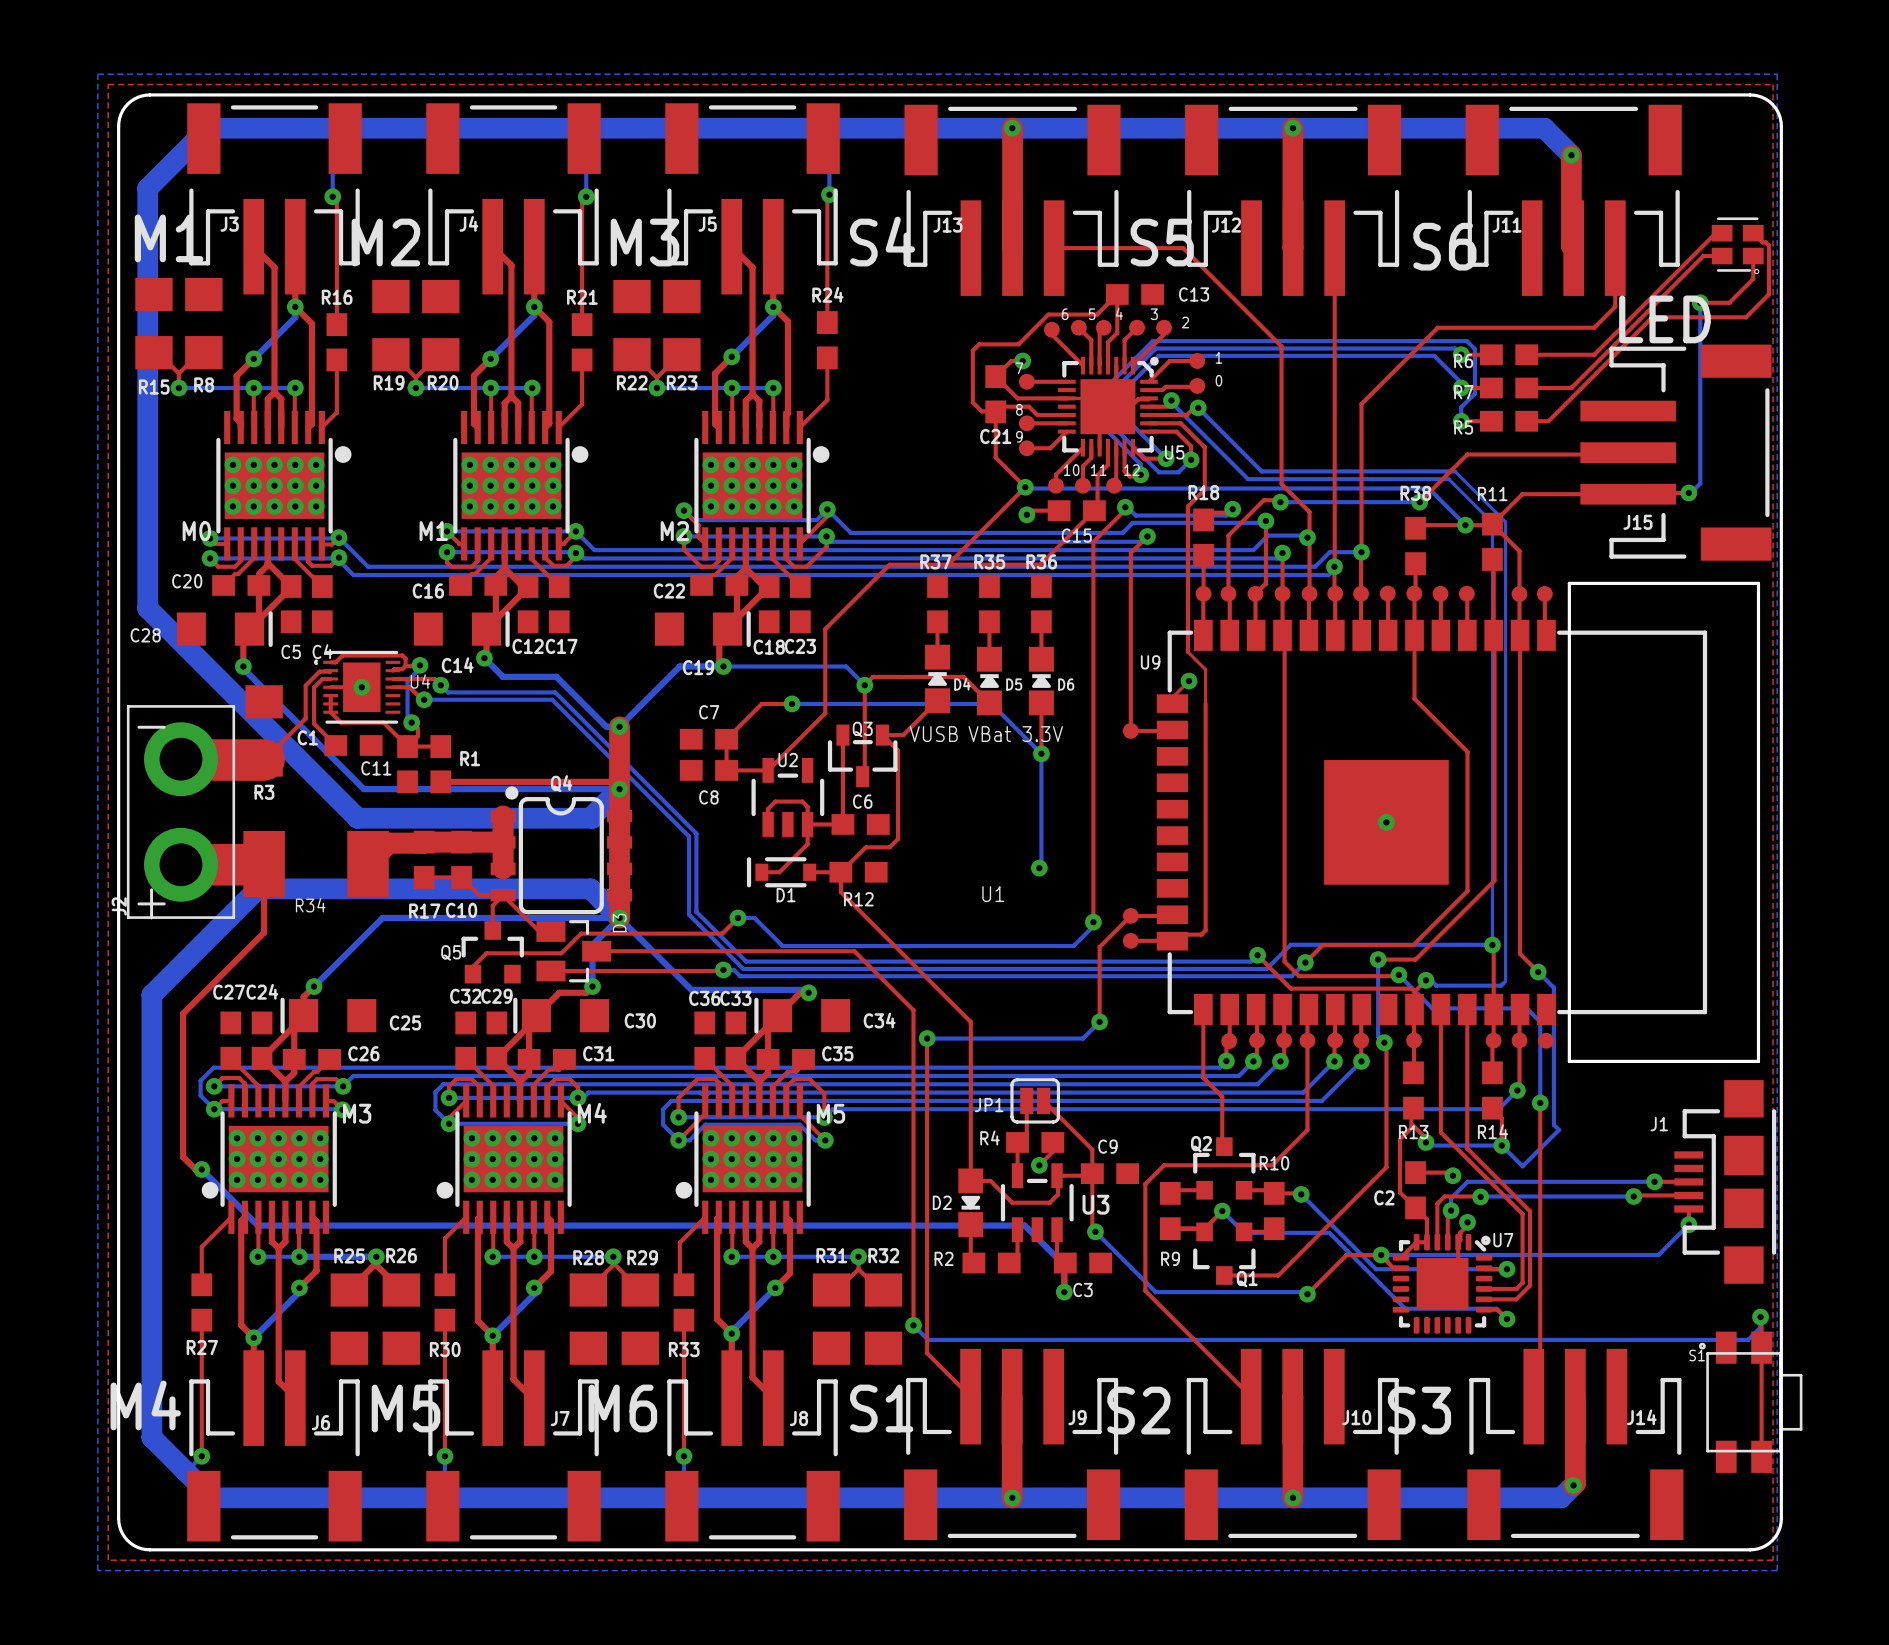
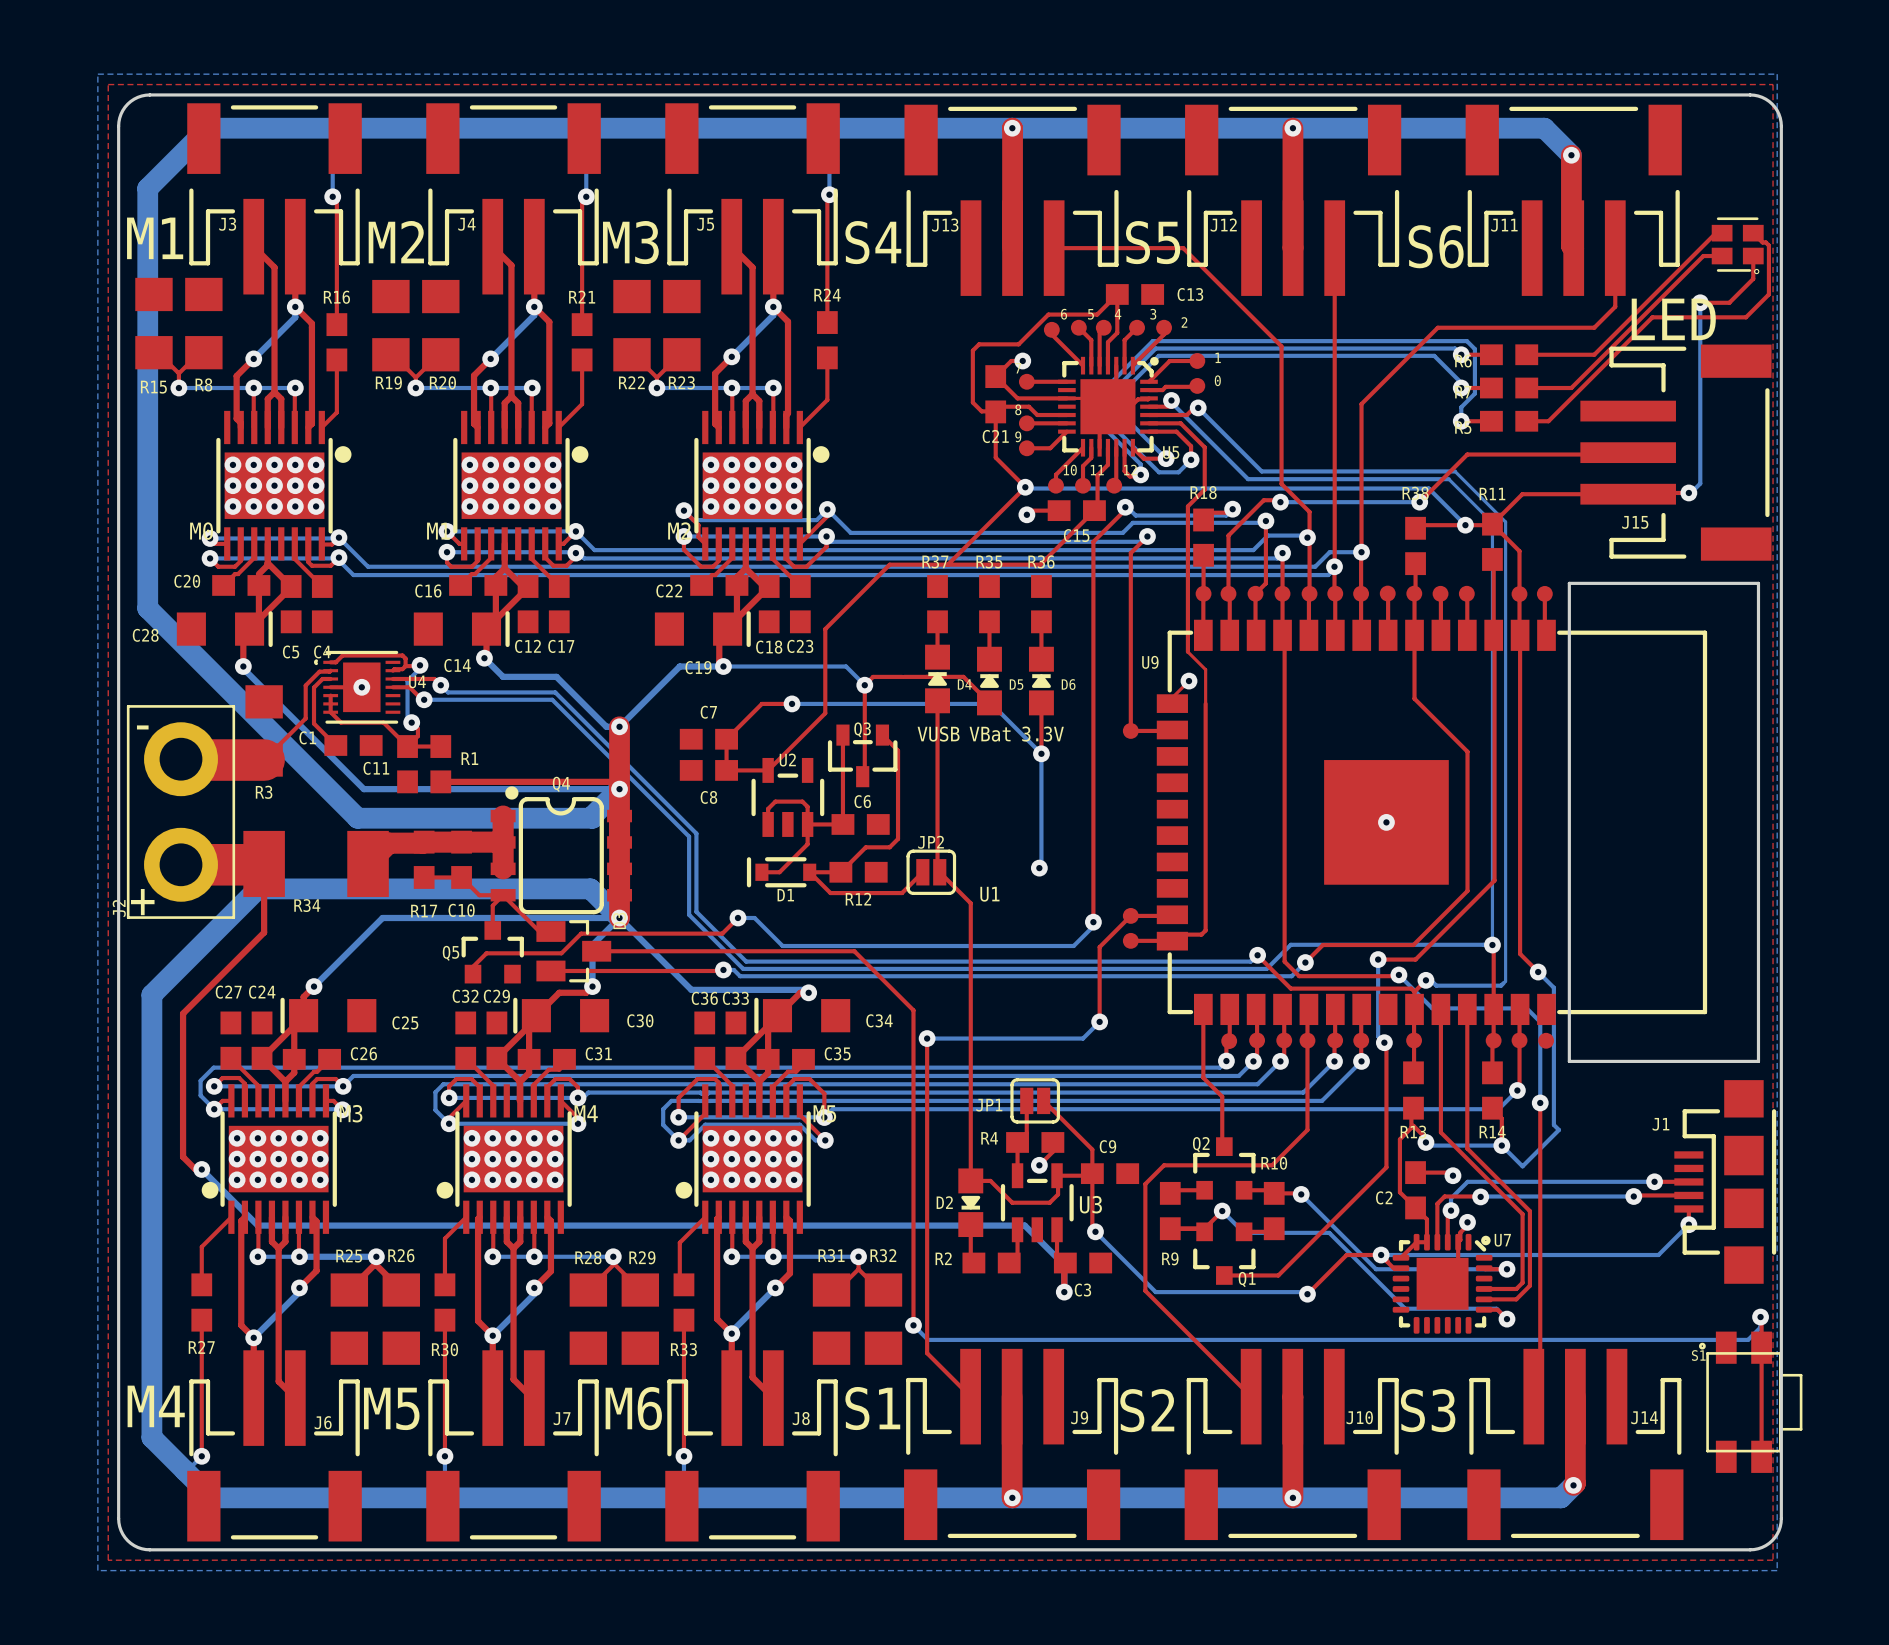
top track: (937, 700) (903, 735) (882, 735) -> none
top track: none -> (809, 872) (830, 893) (902, 893) (922, 872)
top track: (840, 872) (840, 892) (970, 1021) -> (937, 700) (937, 870) (970, 903) (970, 1021)
JP2: none -> (931, 872)

